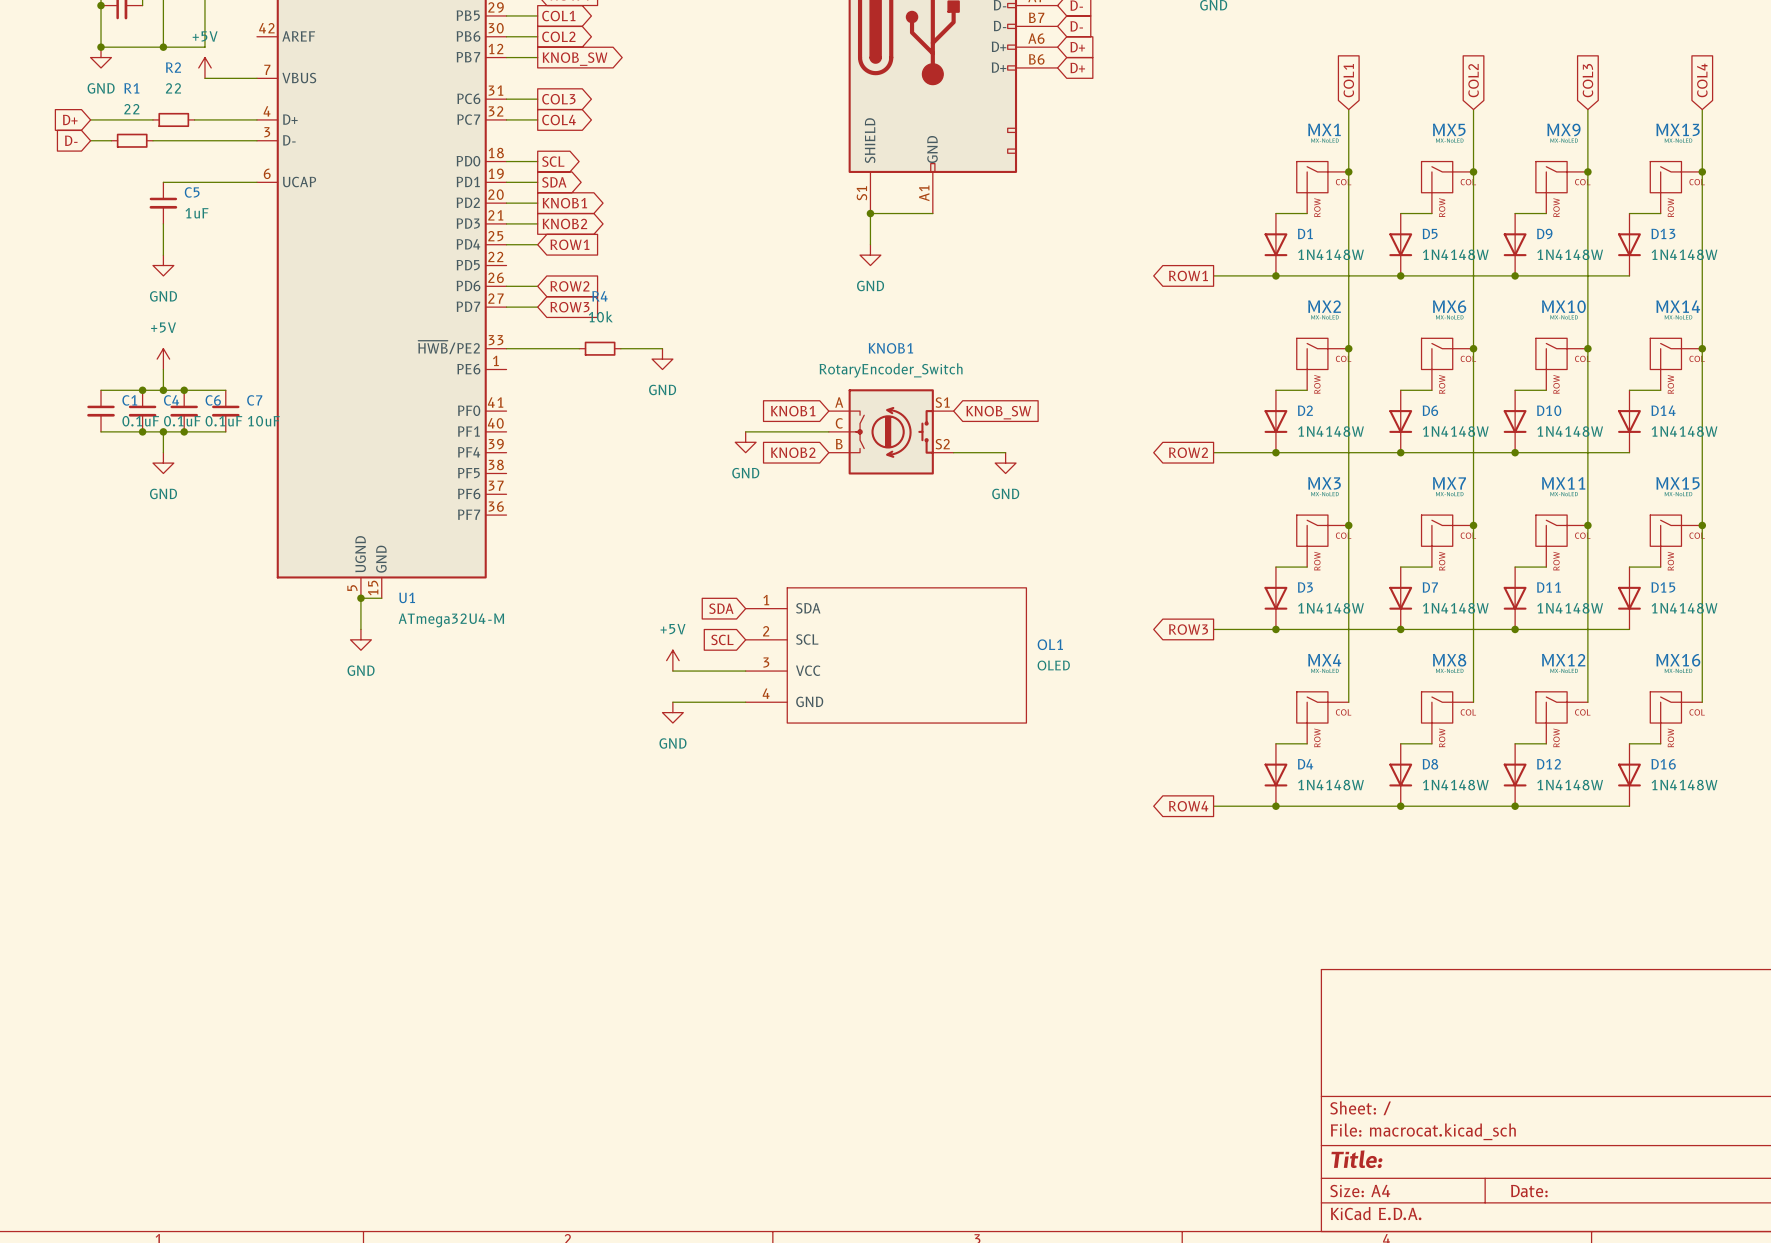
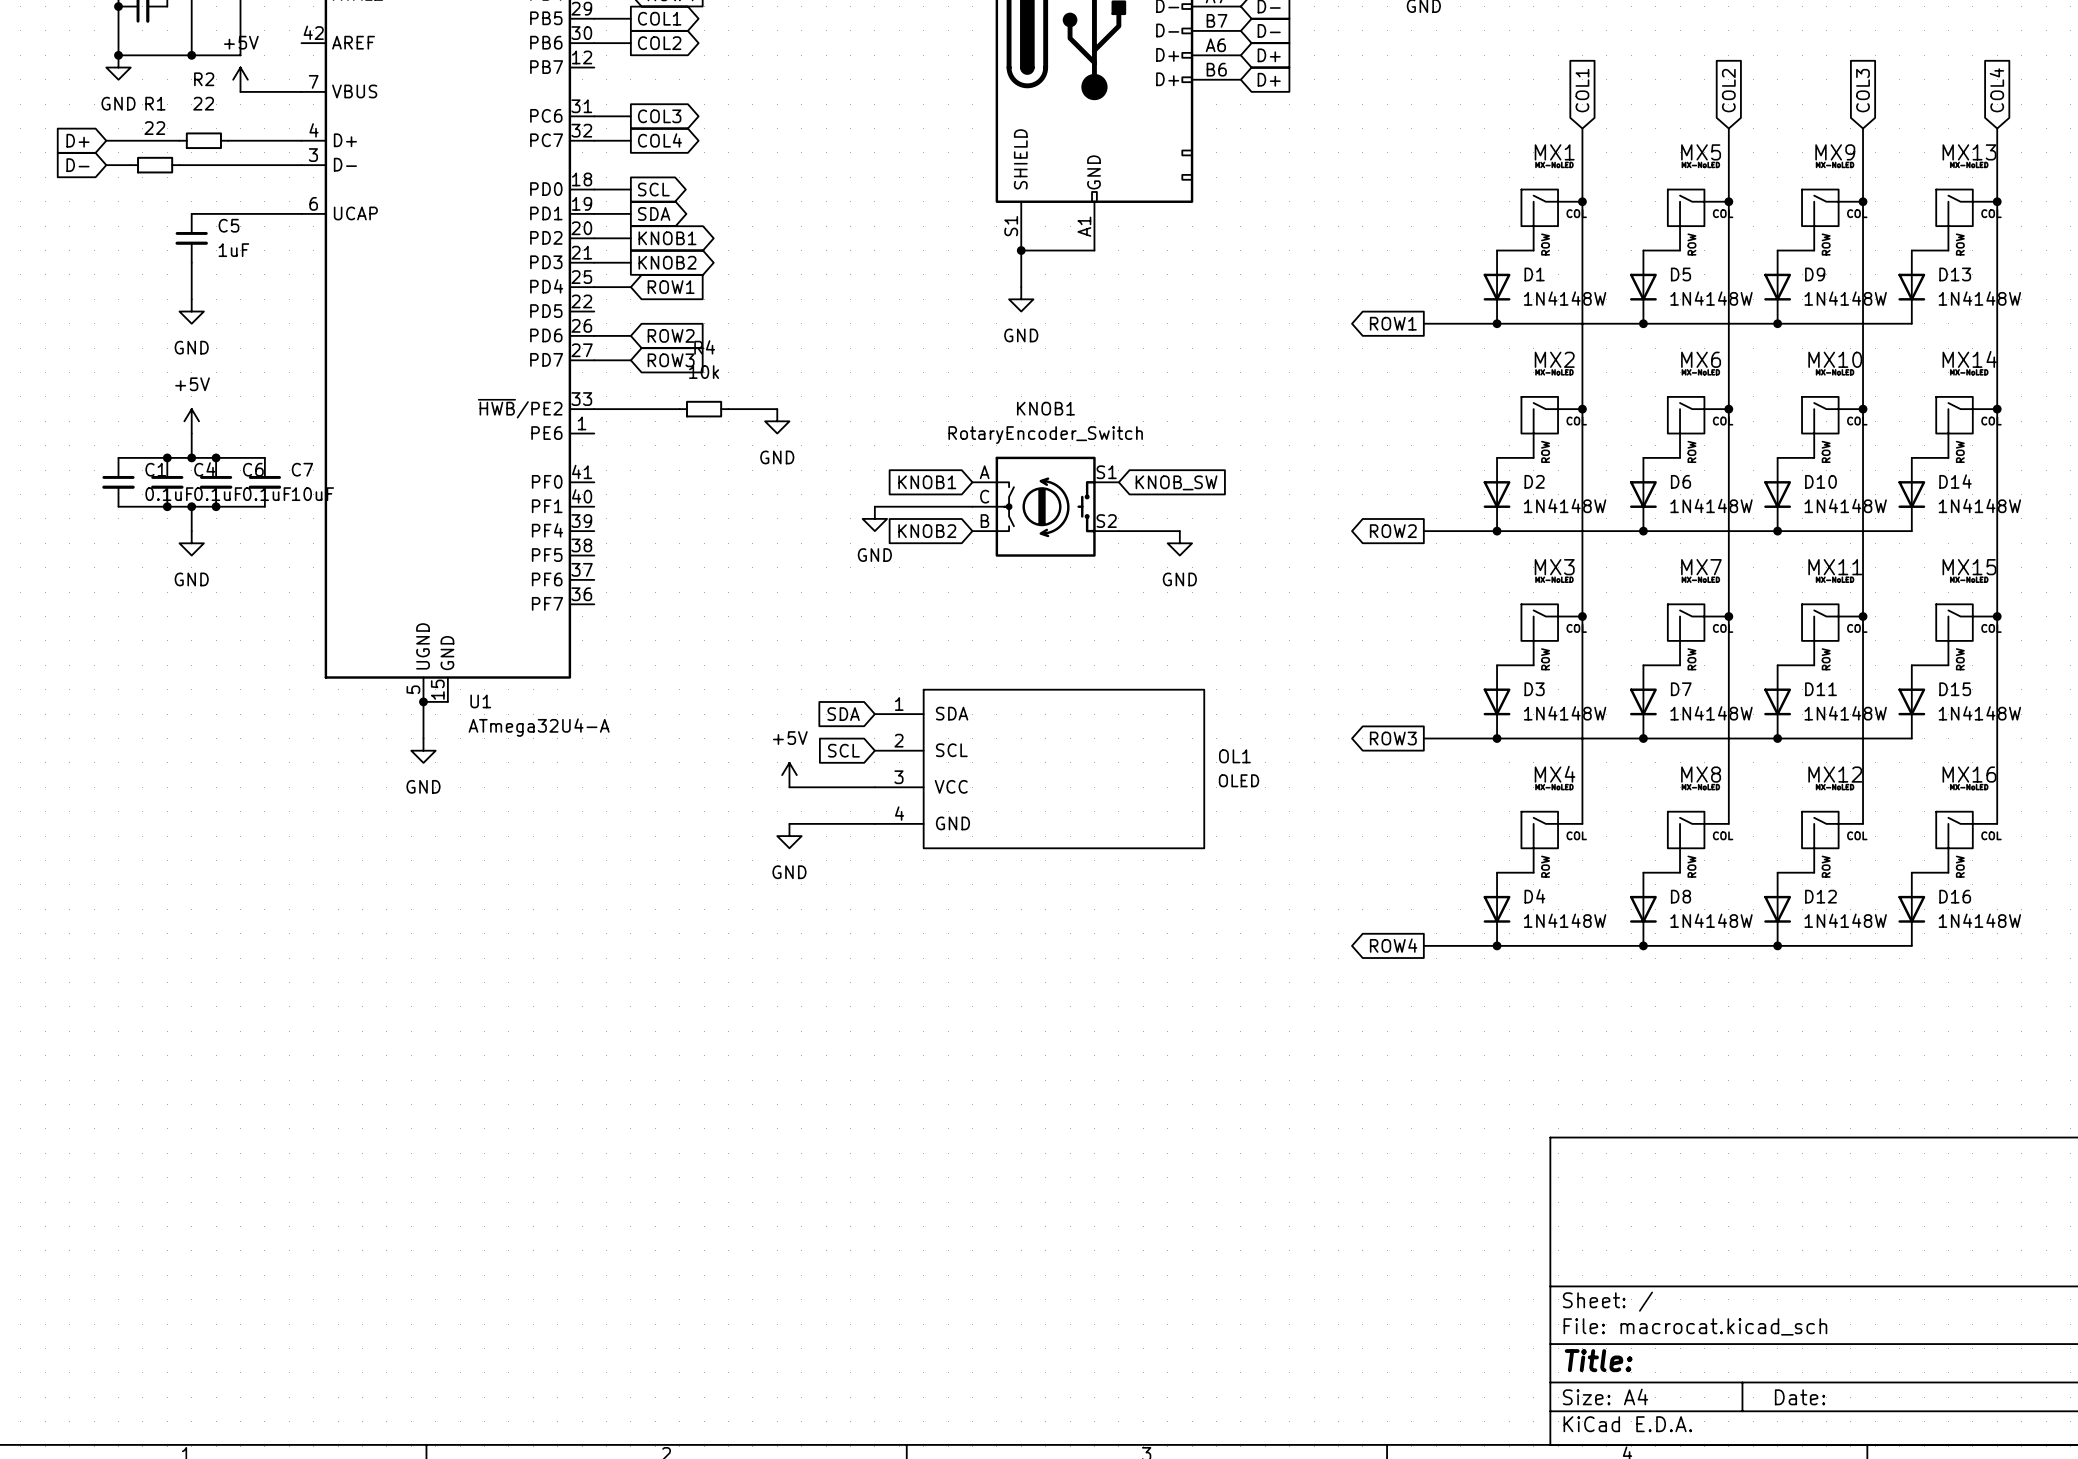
wire: (506, 57) (537, 57) -> none
global label: KNOB_SW (575, 59) -> none
U1 value: ATmega32U4-M (451, 620) -> ATmega32U4-A (539, 727)

